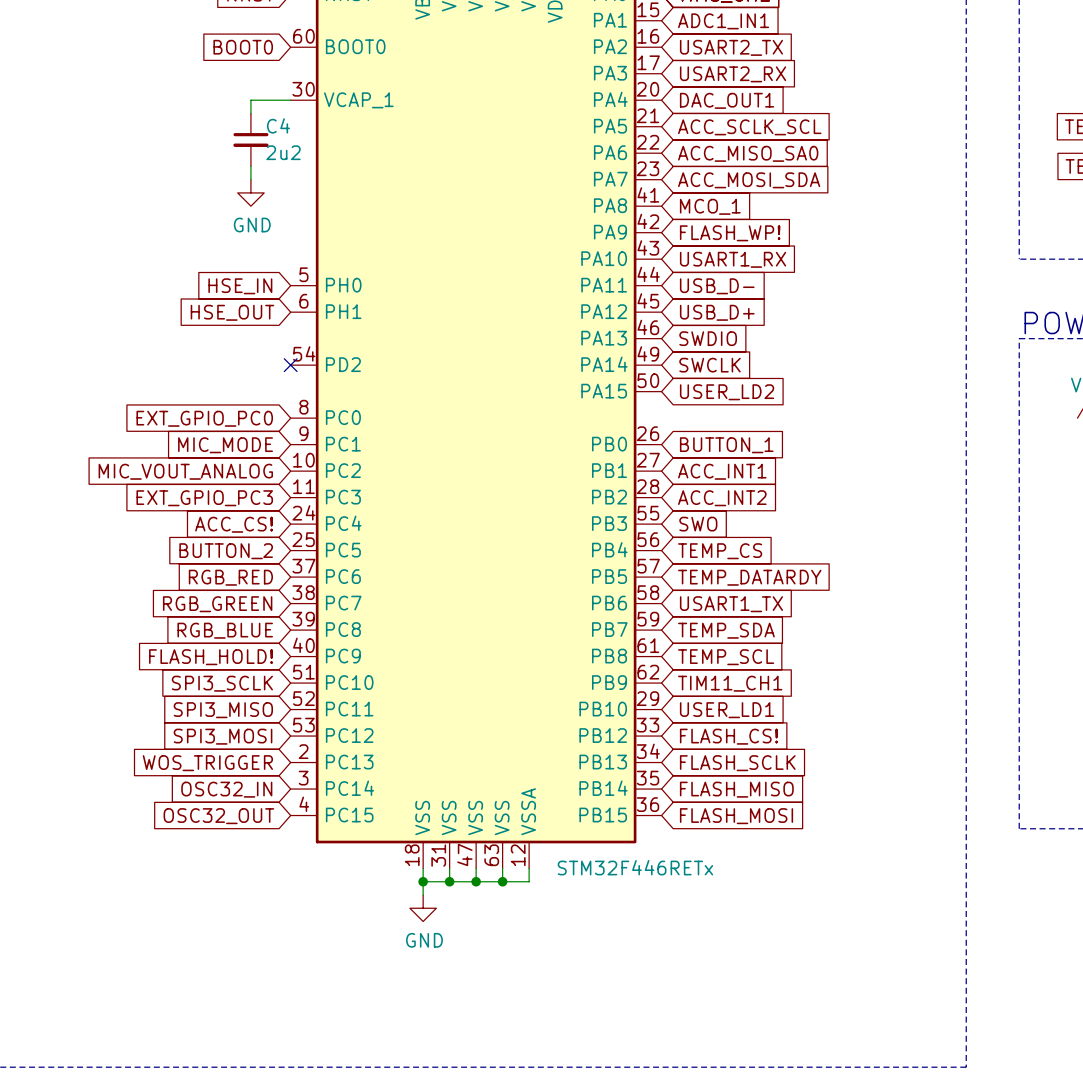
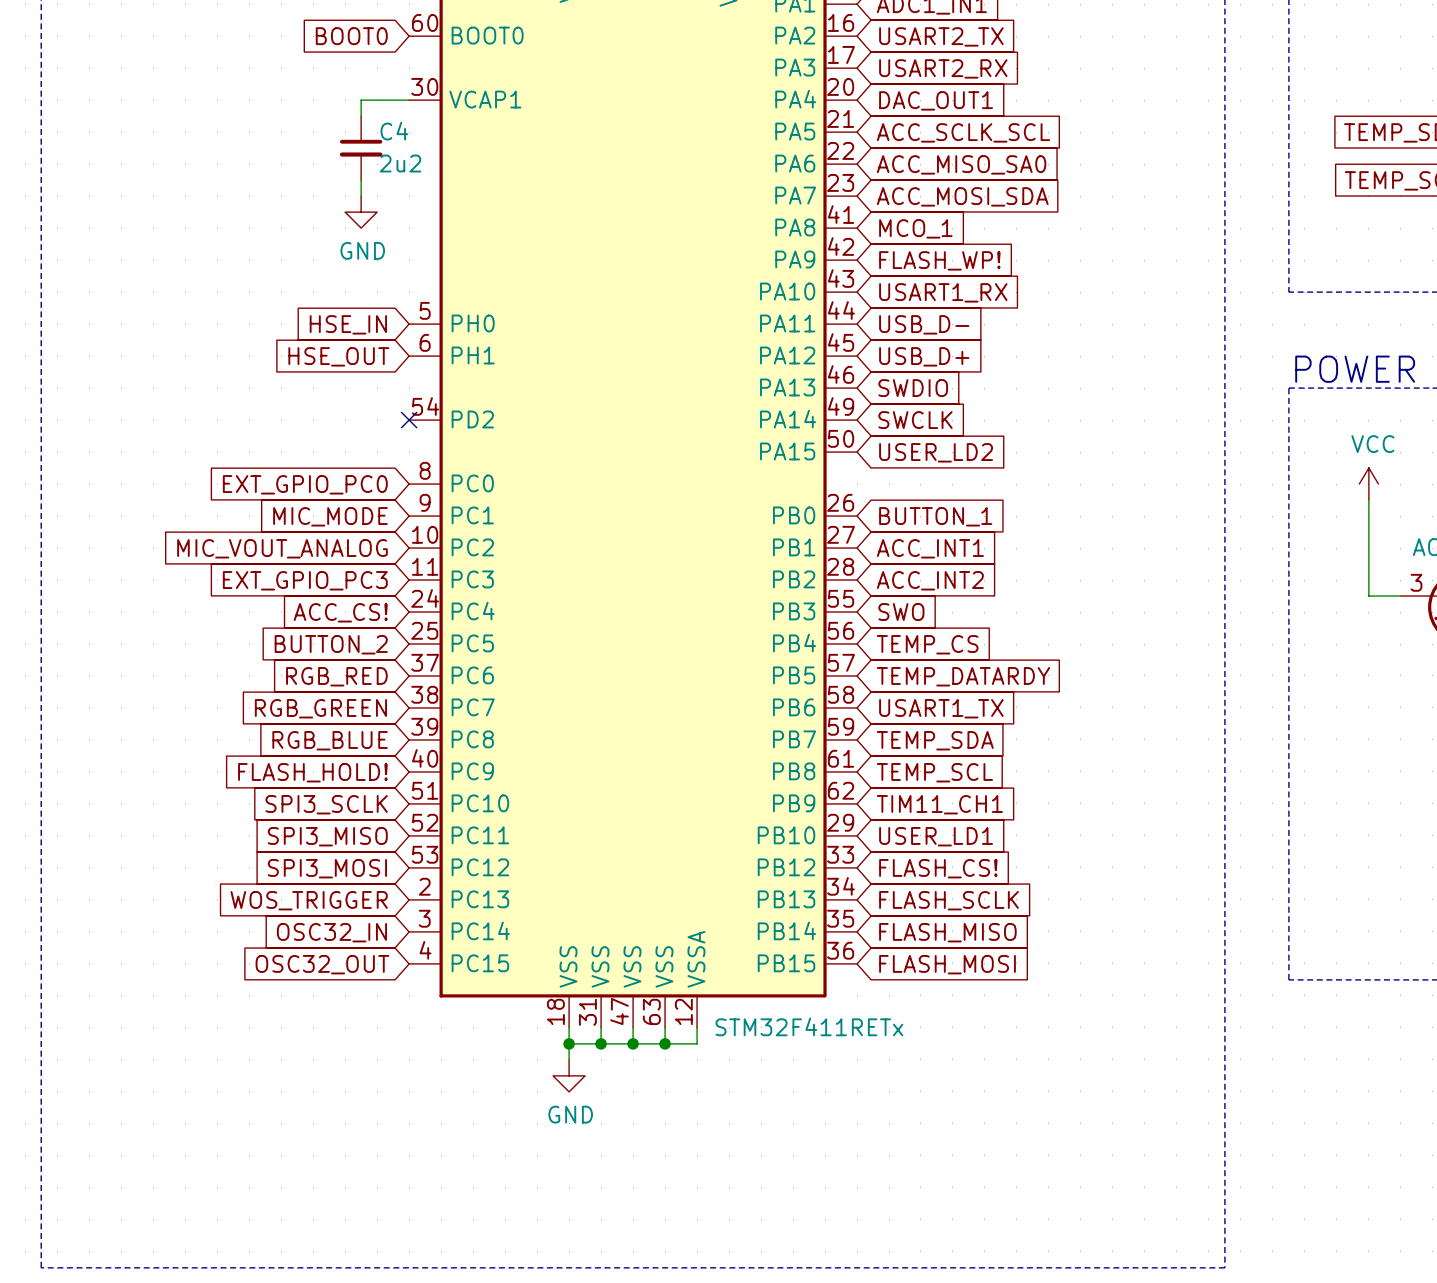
part pin name: VCAP_1 (358, 100) -> VCAP1 (485, 99)
part value: STM32F446RETx (635, 867) -> STM32F411RETx (809, 1026)

